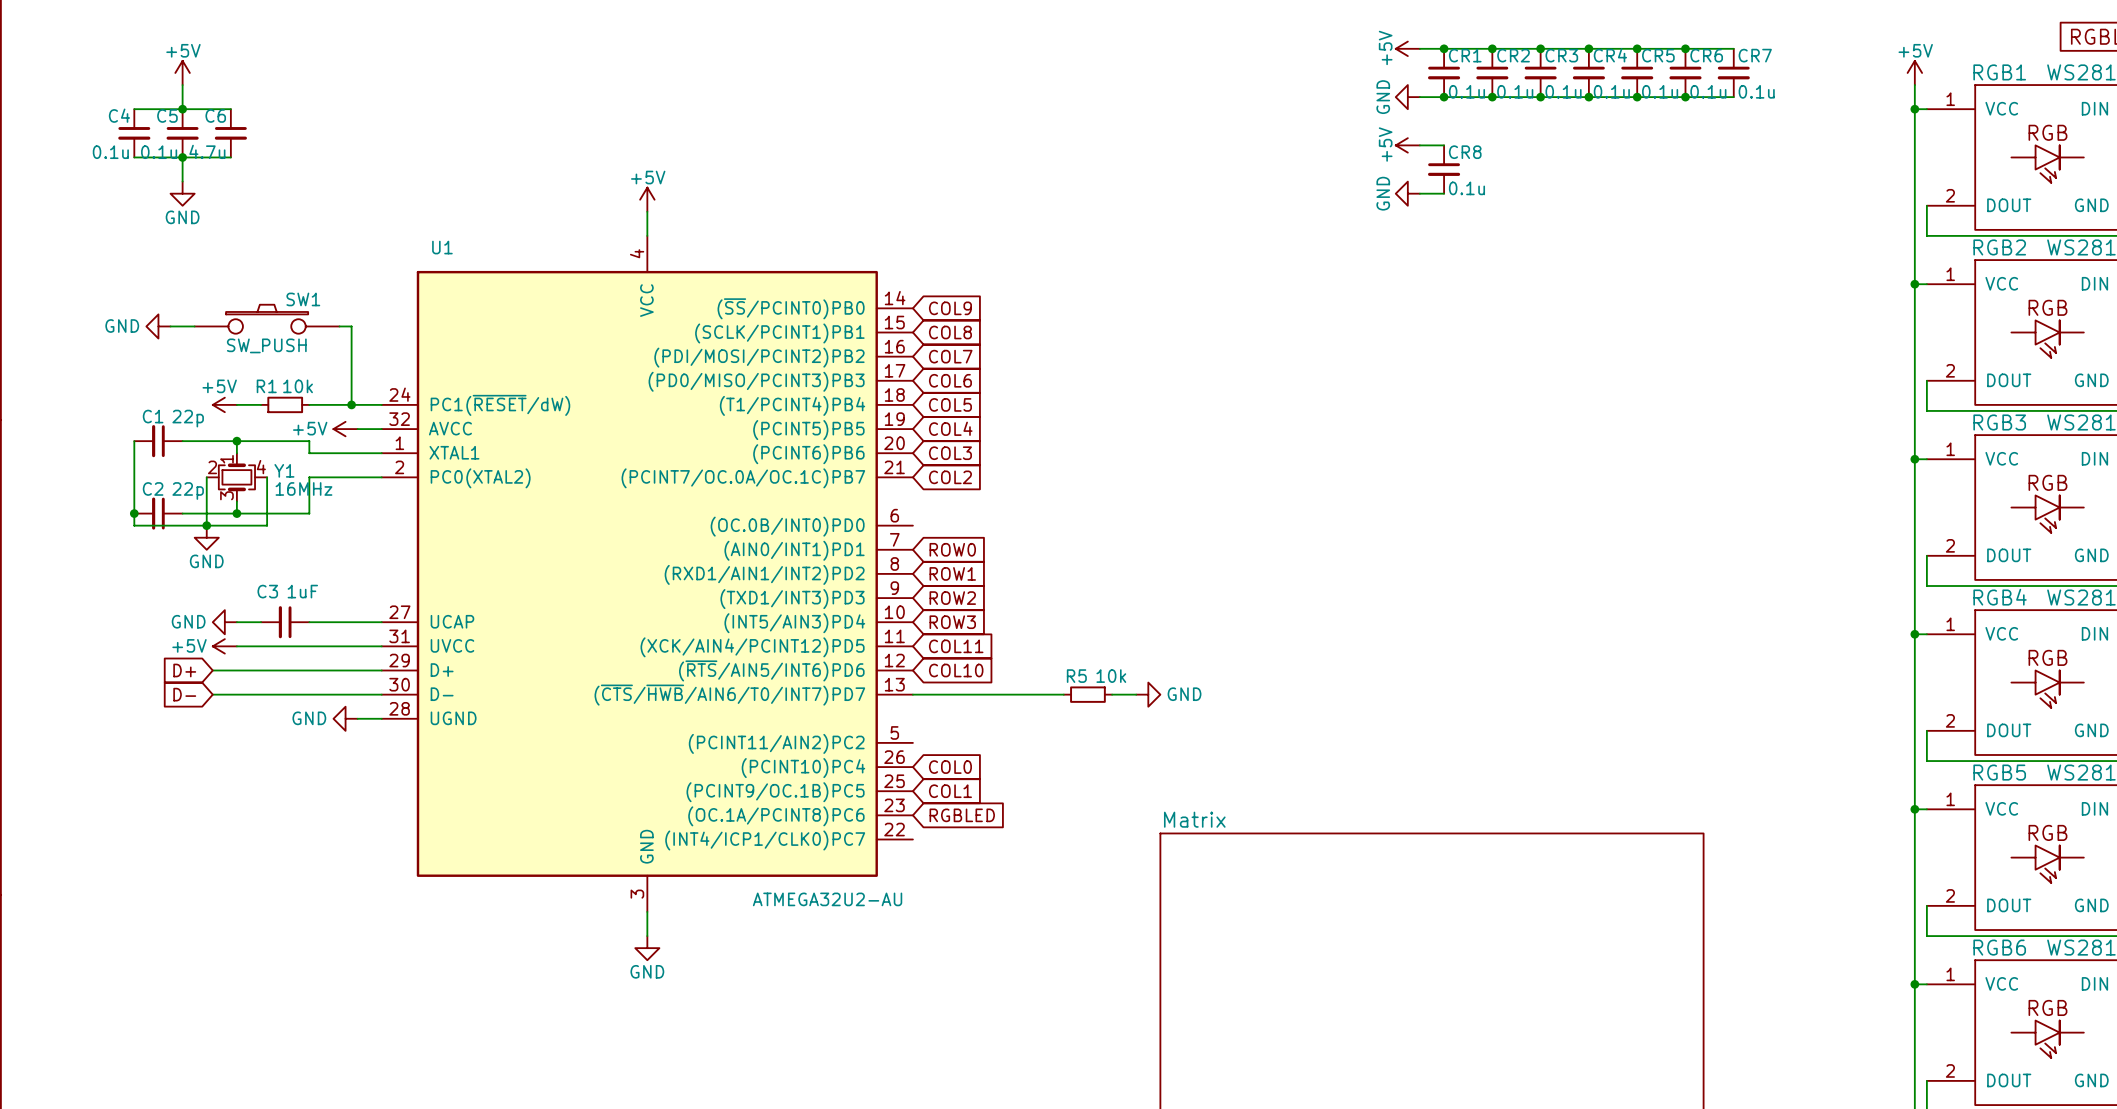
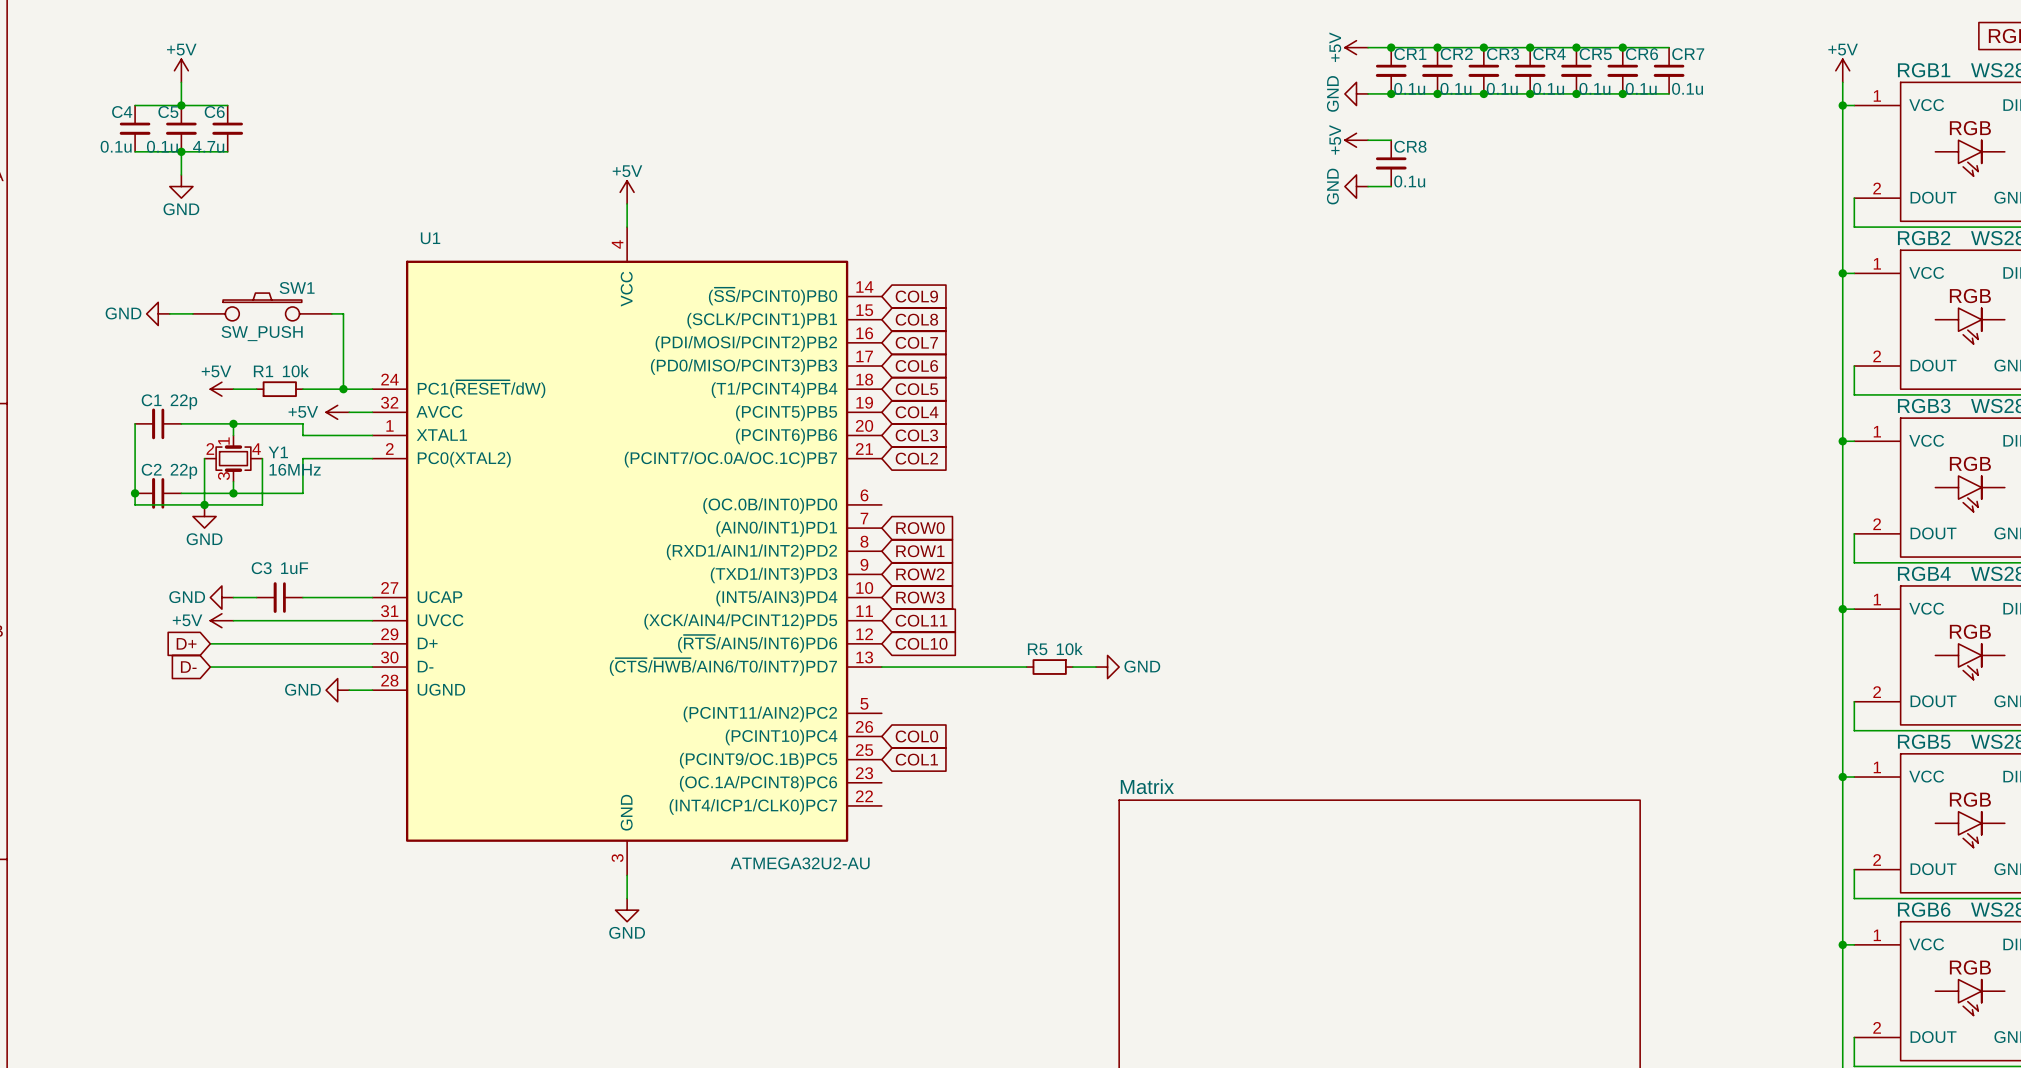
global label: RGBLED (962, 815) -> none

